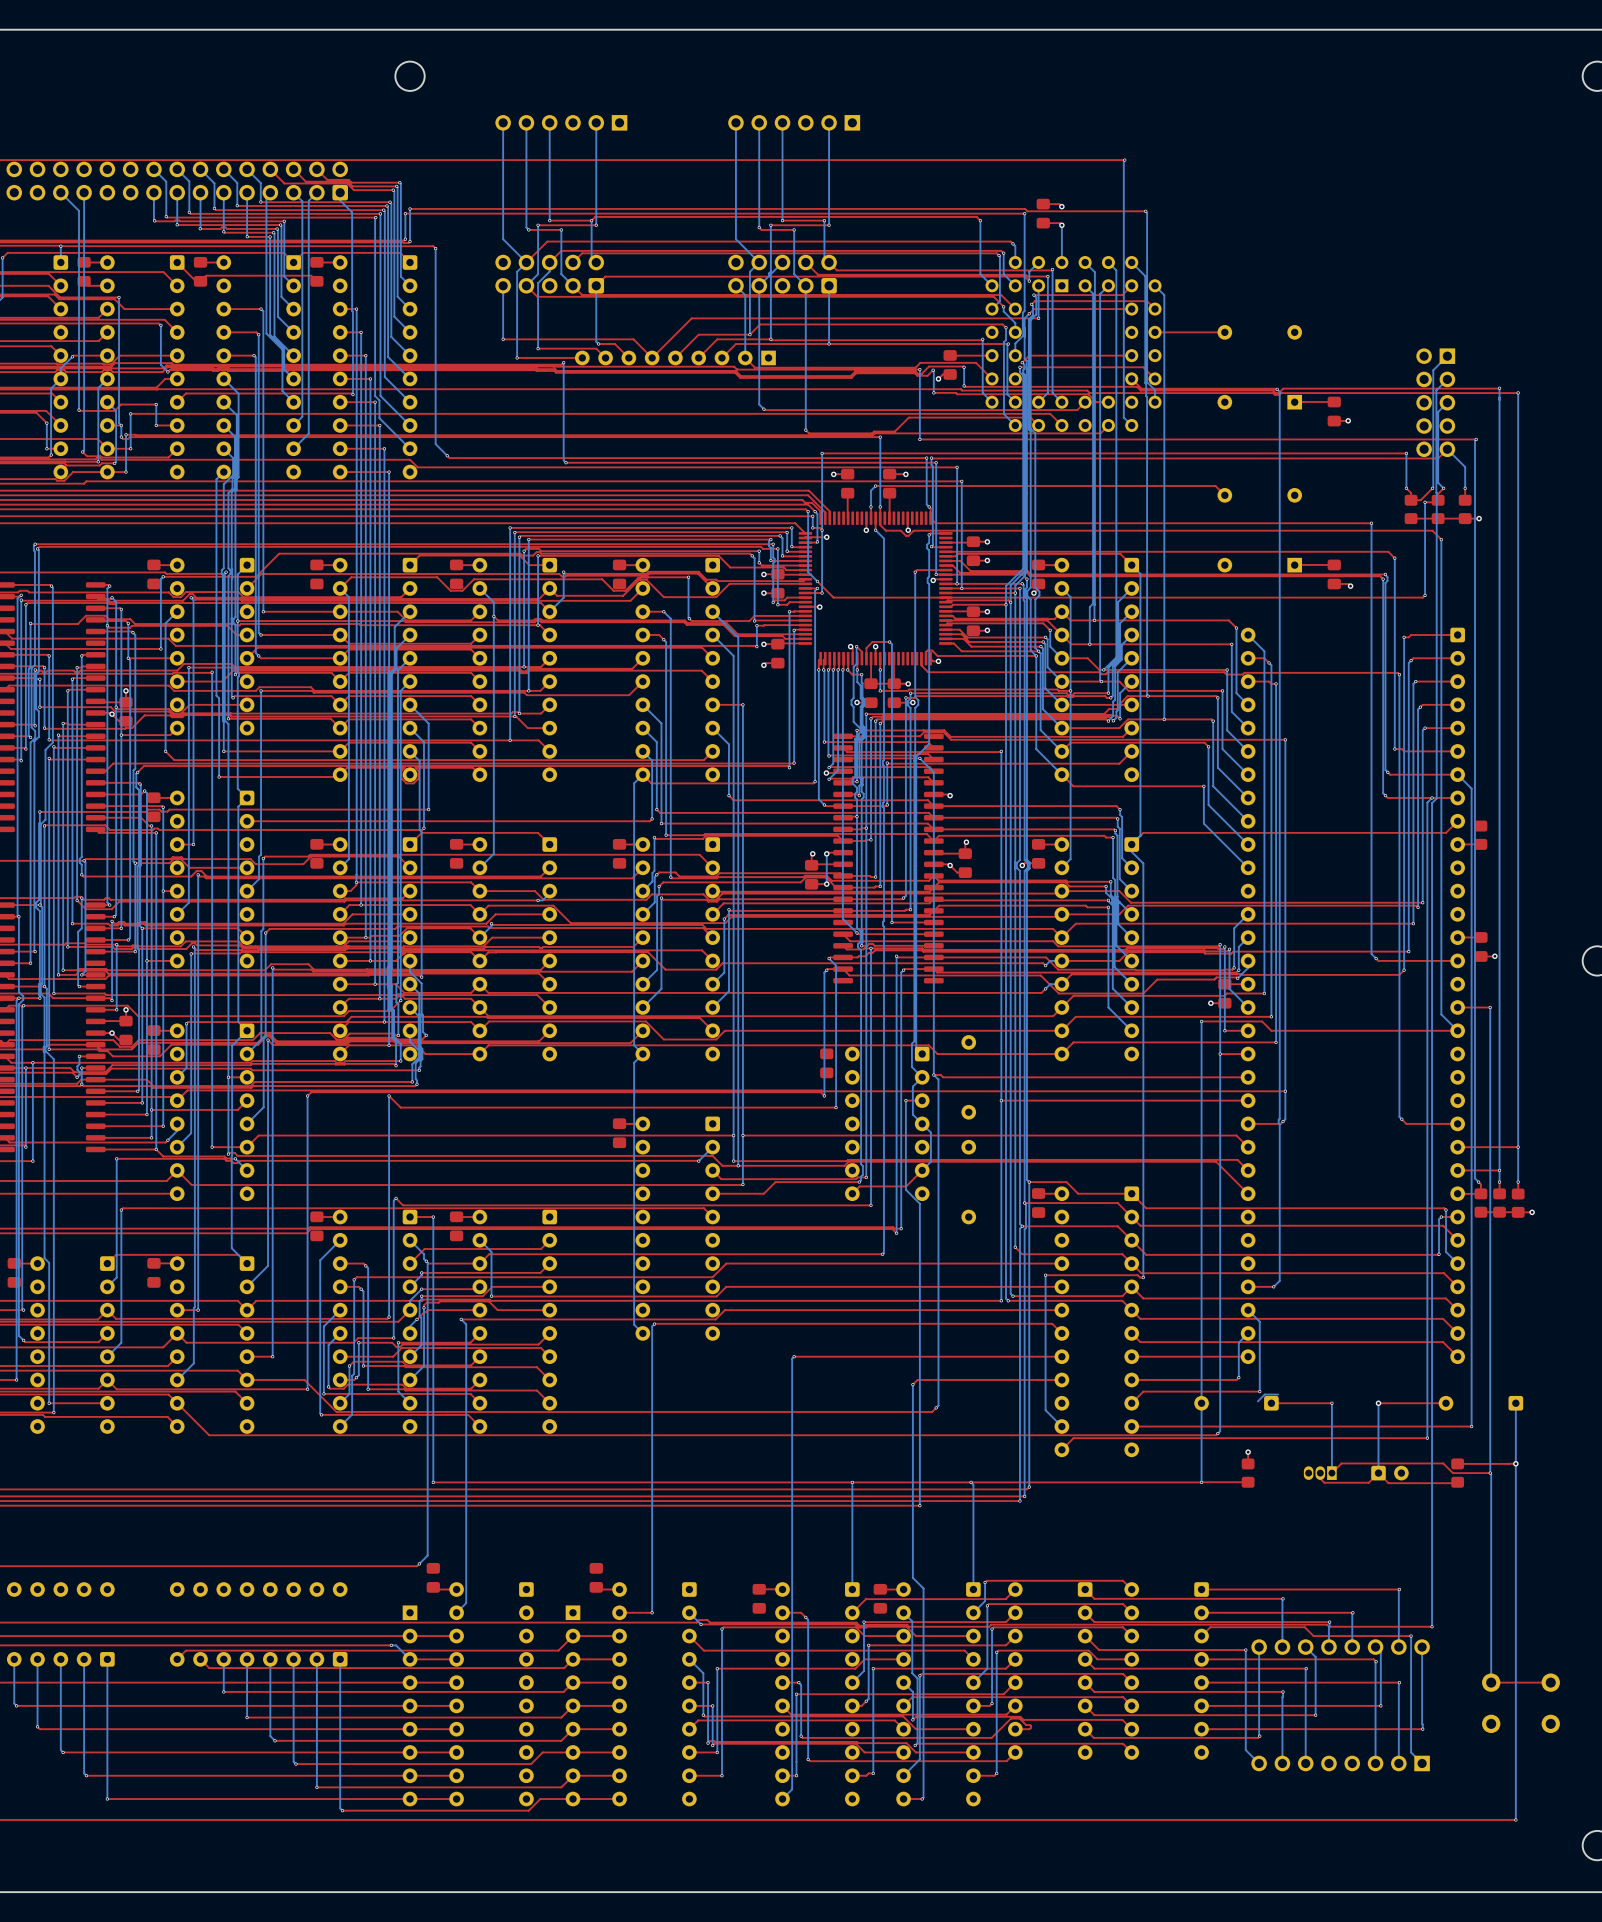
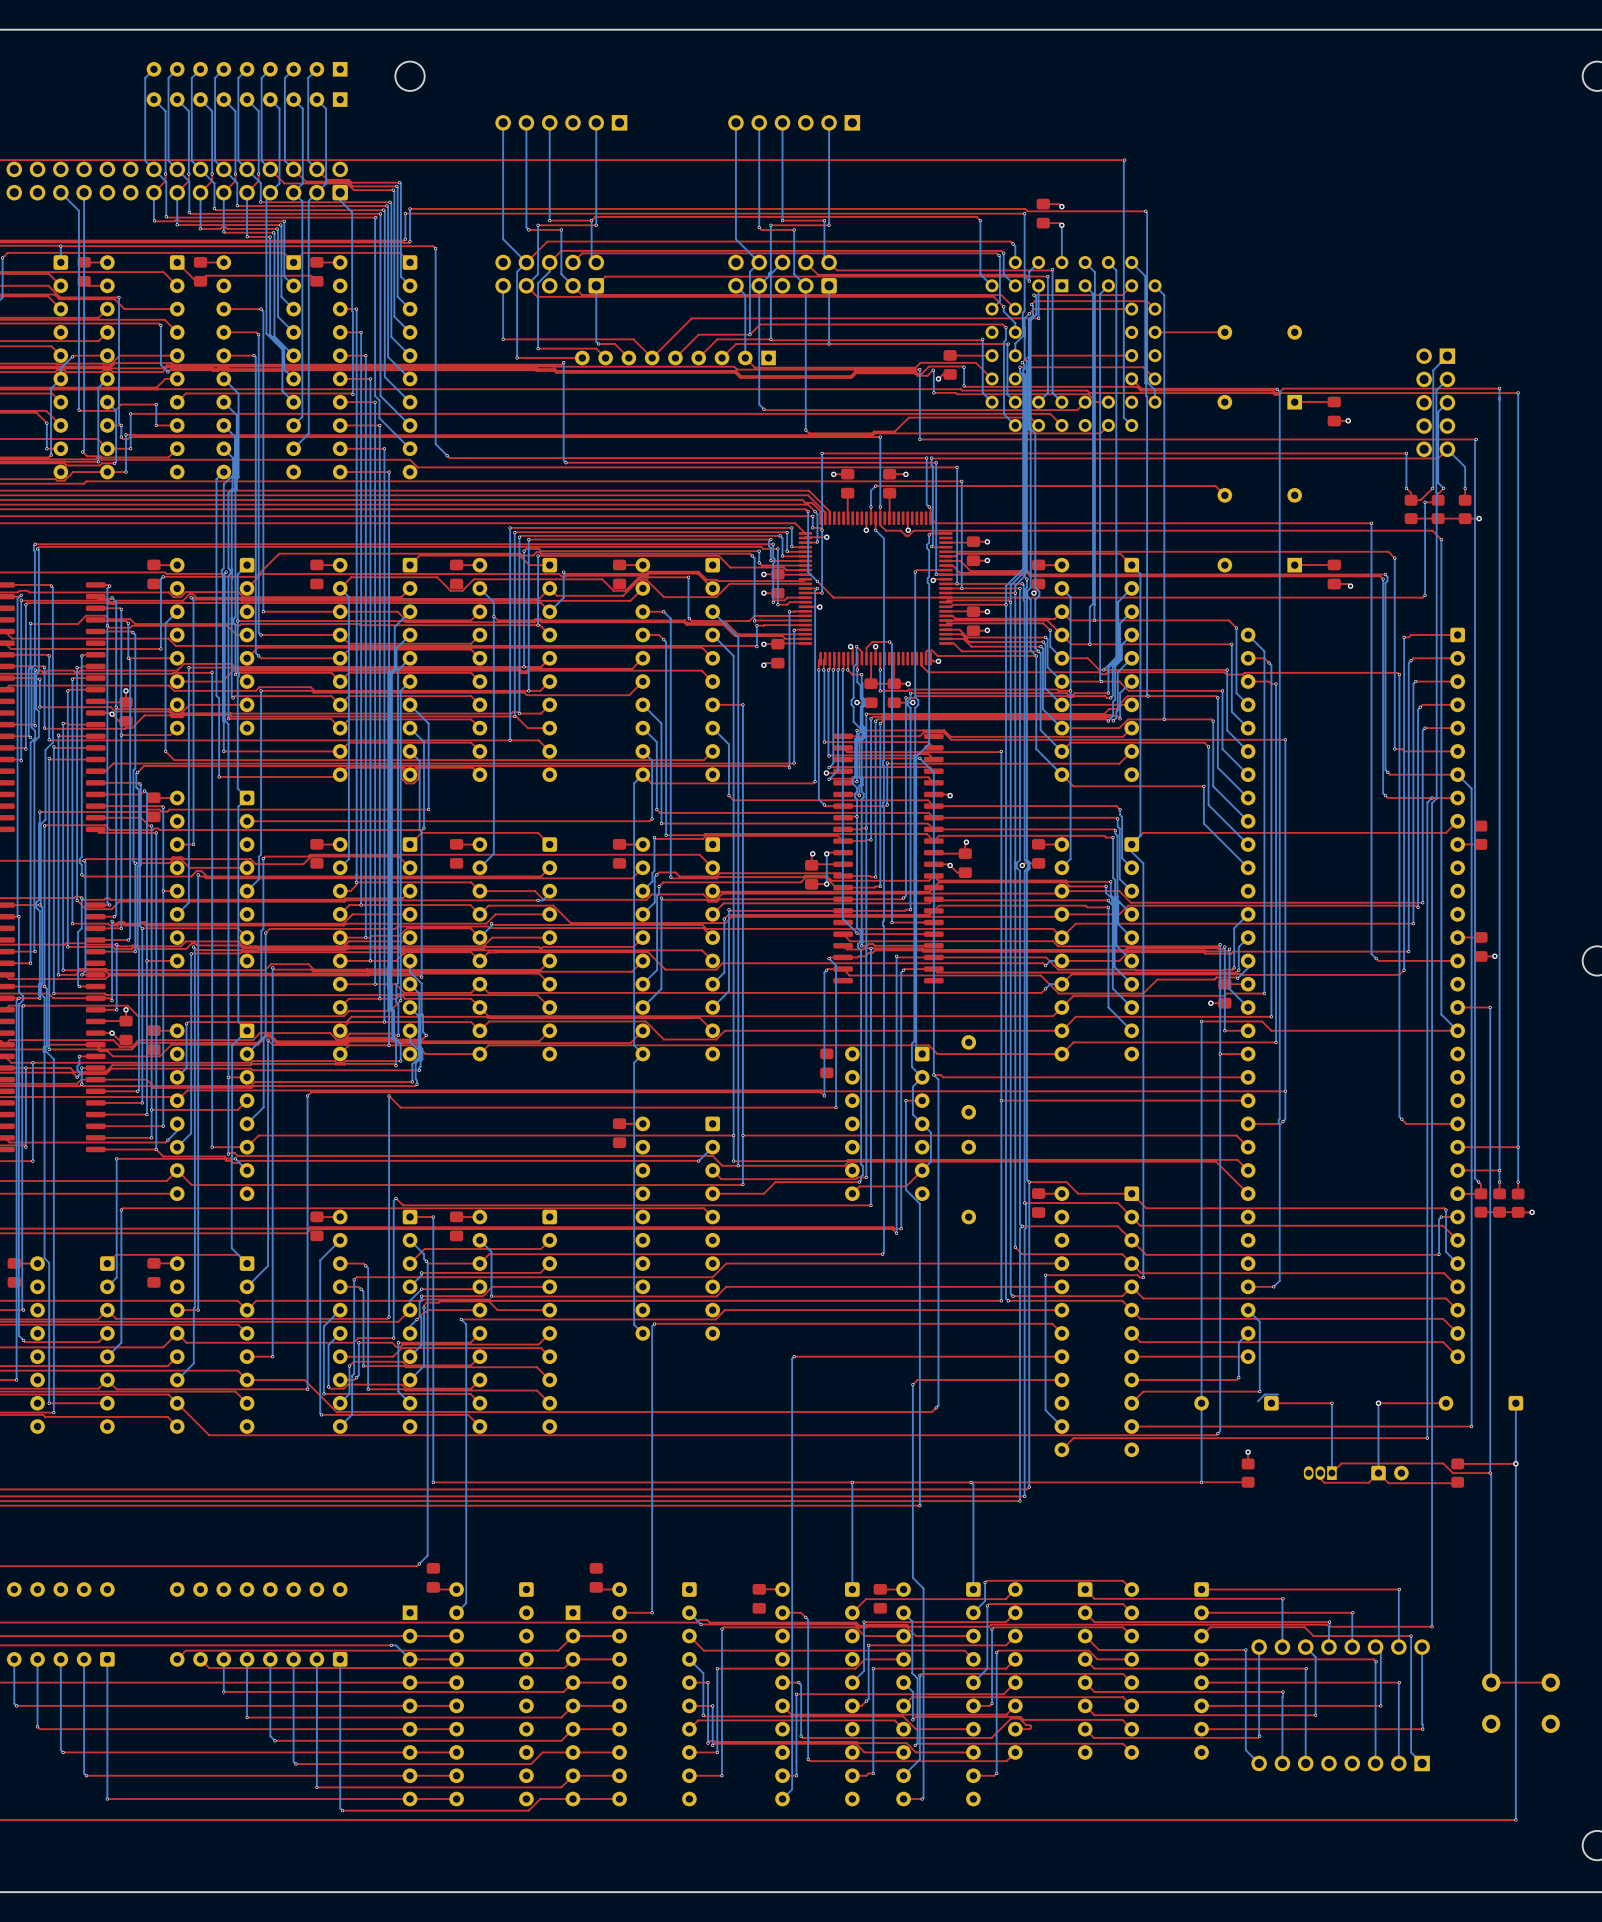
bottom track: none -> (153, 69) (145, 78) (145, 160) (153, 169)
bottom track: none -> (177, 69) (168, 78) (168, 160) (177, 169)
bottom track: none -> (200, 69) (191, 78) (191, 160) (200, 169)
bottom track: none -> (223, 69) (215, 78) (215, 160) (223, 169)
bottom track: none -> (247, 69) (238, 78) (238, 160) (247, 169)
part: none -> (247, 69)
bottom track: none -> (270, 69) (261, 78) (261, 160) (270, 169)
bottom track: none -> (293, 69) (284, 78) (284, 160) (293, 169)
bottom track: none -> (316, 69) (308, 78) (308, 160) (316, 169)
bottom track: none -> (153, 99) (165, 111) (165, 174)
bottom track: none -> (177, 99) (188, 111) (188, 174)
bottom track: none -> (200, 99) (212, 111) (212, 174)
bottom track: none -> (223, 99) (235, 111) (235, 174)
bottom track: none -> (247, 99) (258, 111) (258, 174)
part: none -> (247, 99)
bottom track: none -> (270, 99) (279, 108) (279, 183) (270, 192)
bottom track: none -> (293, 99) (302, 108) (302, 183) (293, 192)
bottom track: none -> (316, 99) (326, 108) (326, 183) (316, 192)
top track: none -> (165, 174) (165, 181) (153, 192)
via: none -> (165, 174)
top track: none -> (188, 174) (188, 181) (177, 192)
via: none -> (188, 174)
top track: none -> (212, 174) (212, 181) (200, 192)
via: none -> (212, 174)
top track: none -> (235, 174) (235, 181) (223, 192)
via: none -> (235, 174)
top track: none -> (258, 174) (258, 181) (247, 192)
via: none -> (258, 174)

